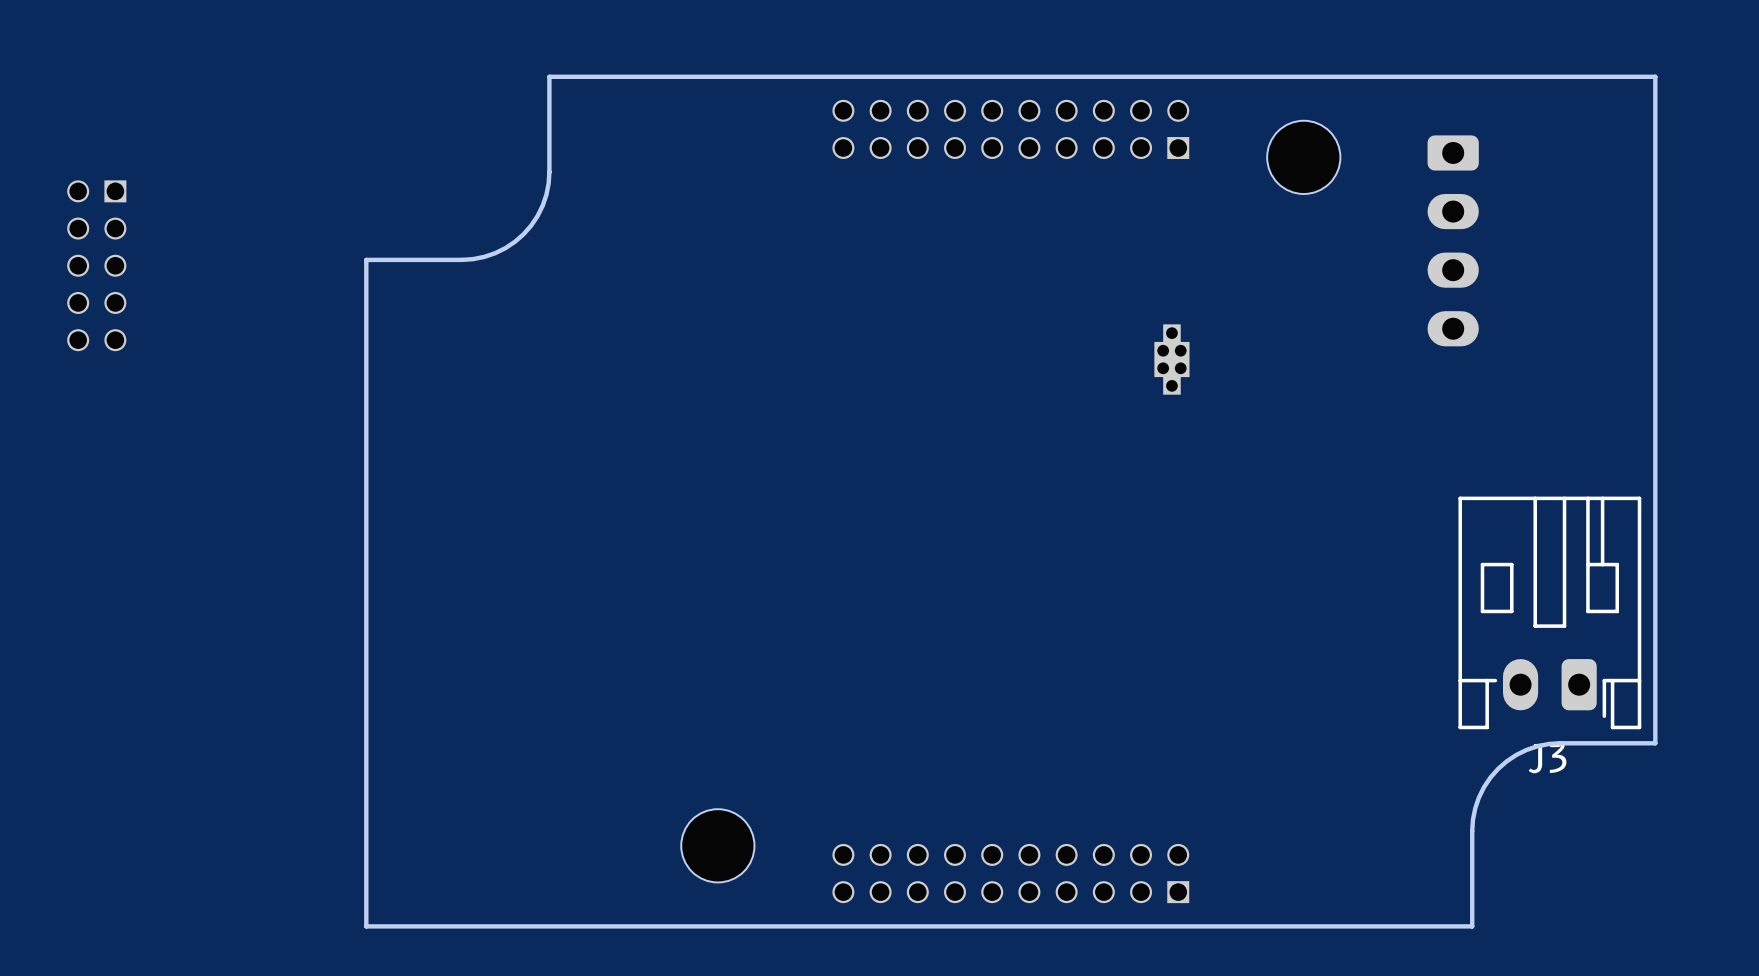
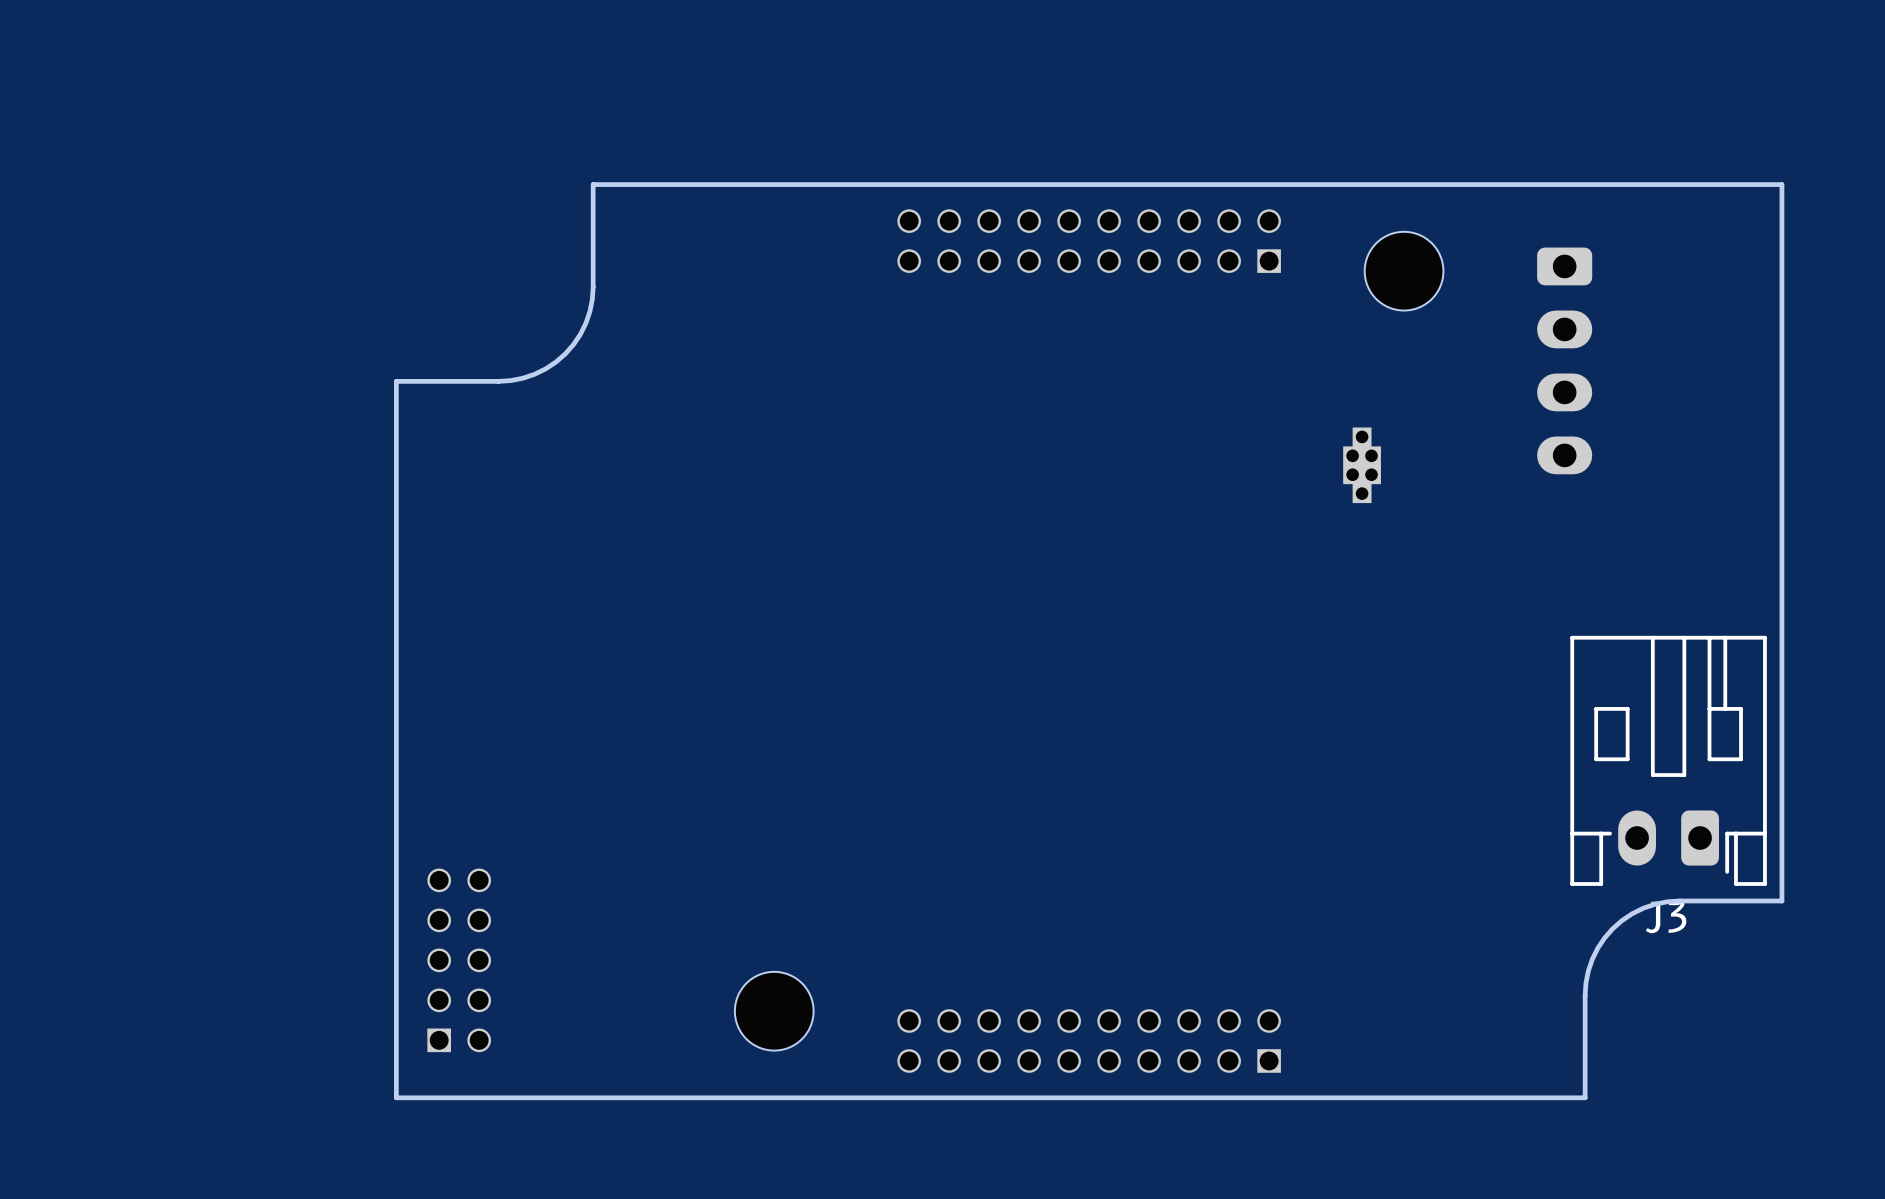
part rotation: 0° (96, 265) -> 180° (459, 960)
part position: (96, 265) -> (459, 960)
part position: (1171, 359) -> (1362, 465)

